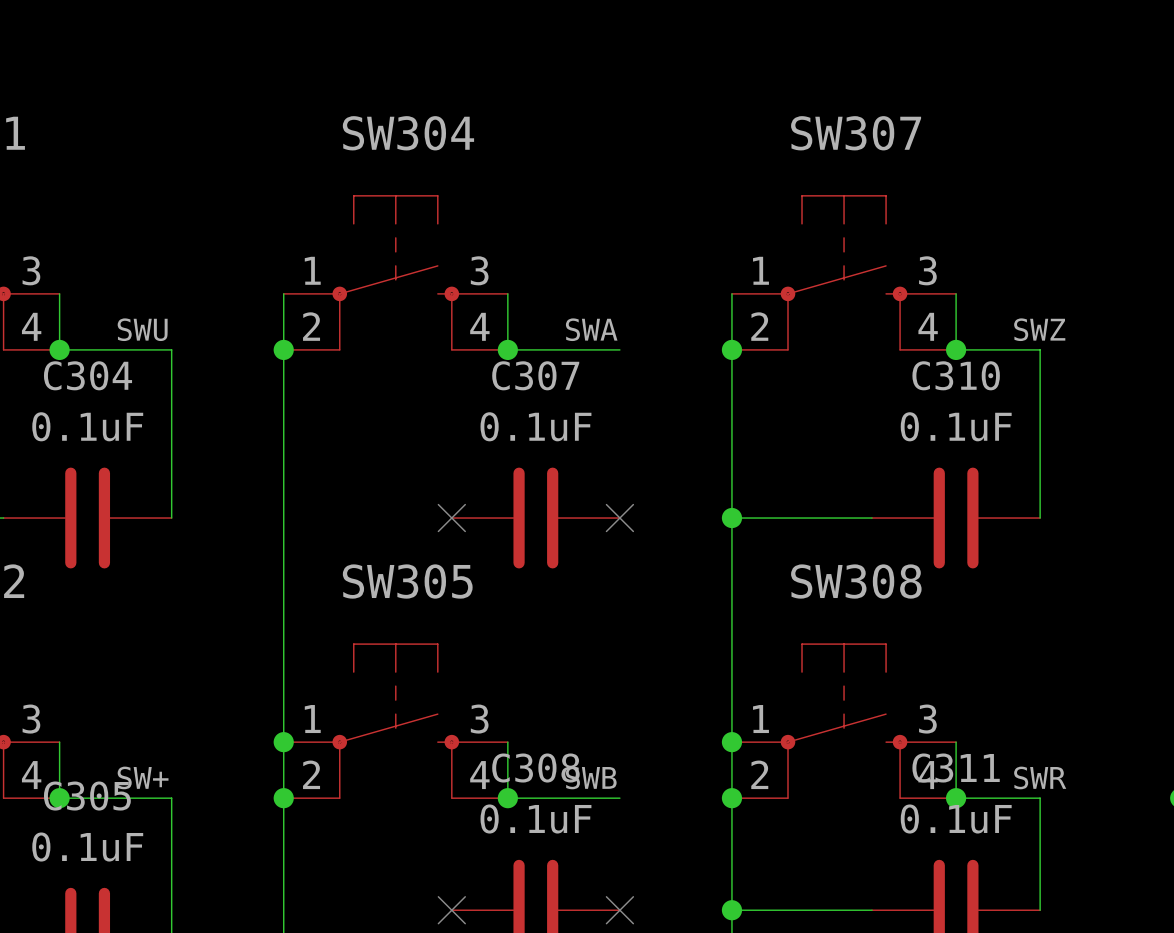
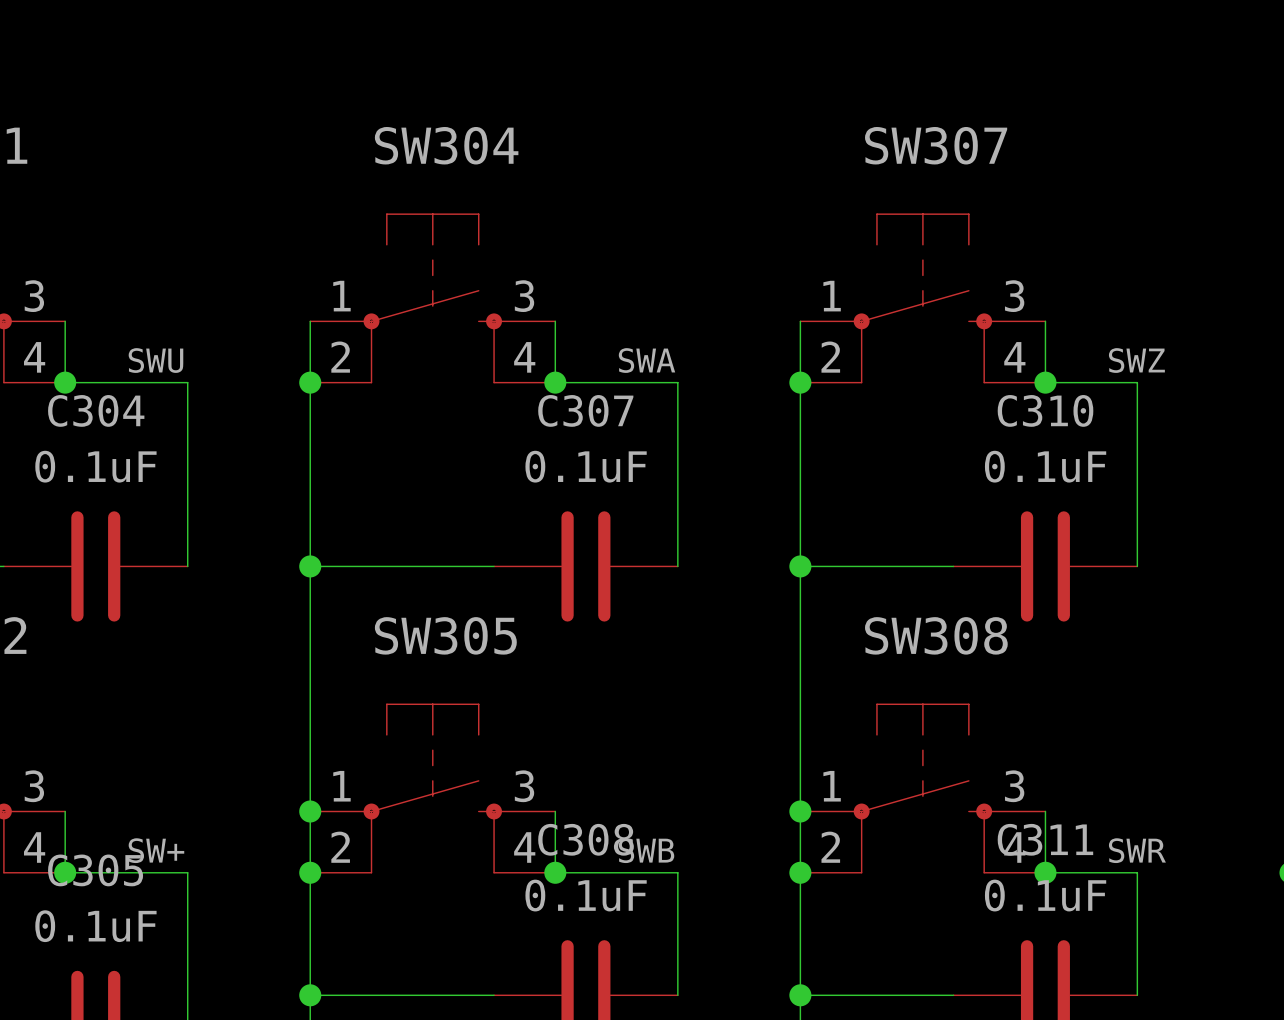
wire: none -> (677, 382) (677, 566)
wire: none -> (310, 566) (494, 566)
junction: none -> (310, 566)
no-connect mark: (451, 518) -> none
no-connect mark: (619, 518) -> none
wire: none -> (677, 872) (677, 995)
wire: none -> (310, 995) (494, 995)
junction: none -> (310, 995)
no-connect mark: (451, 910) -> none
no-connect mark: (619, 910) -> none

